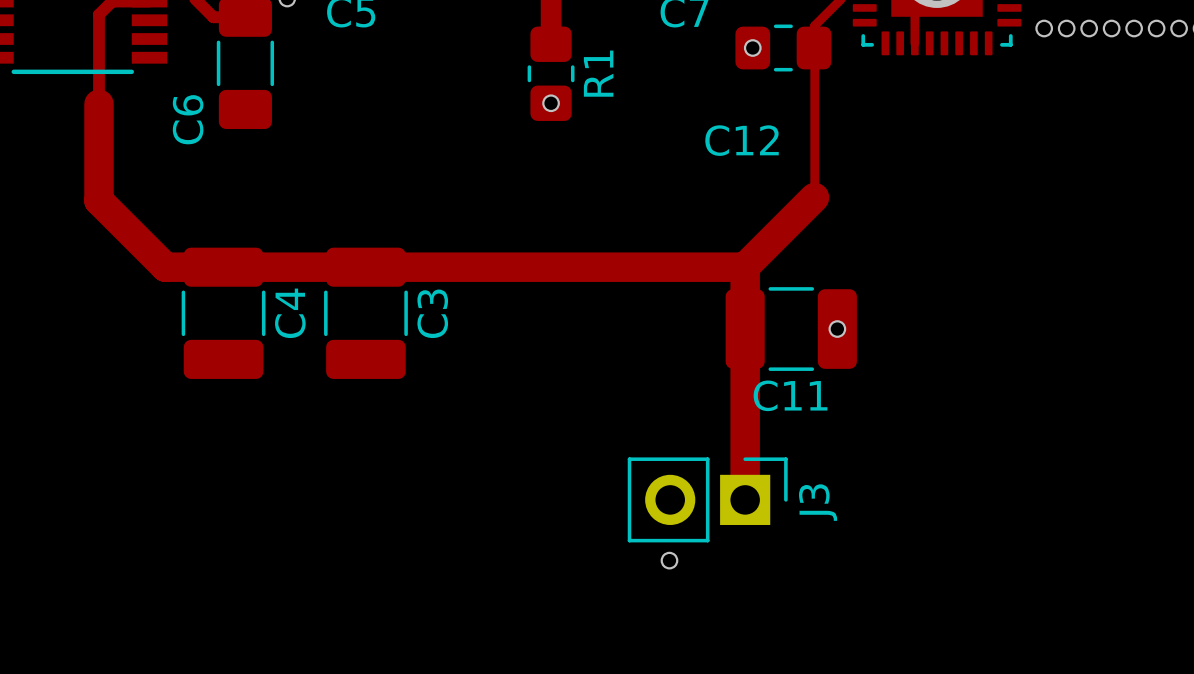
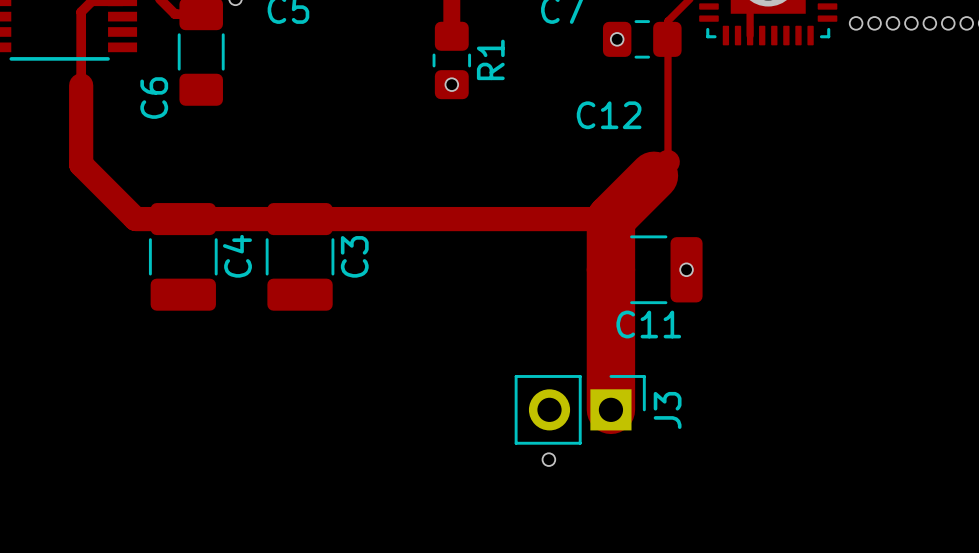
top track width: thin (797, 214) (744, 267) -> thick (653, 175) (610, 219)
top track width: thin (745, 267) (745, 499) -> thick (610, 219) (610, 409)

